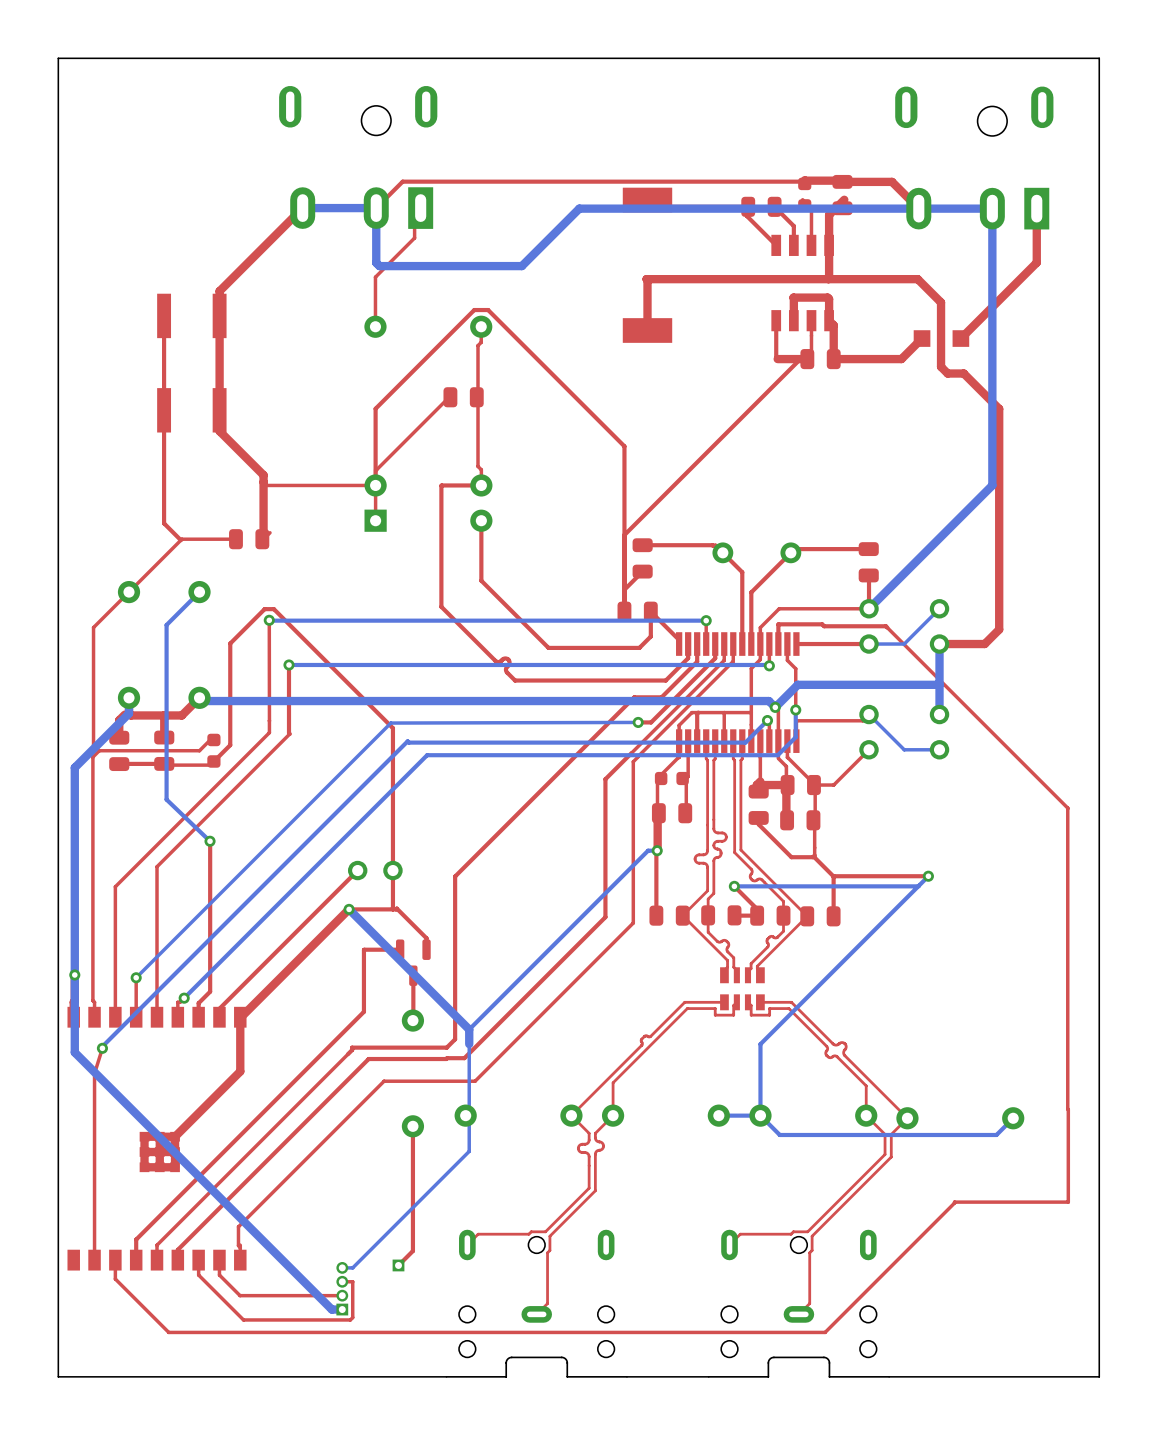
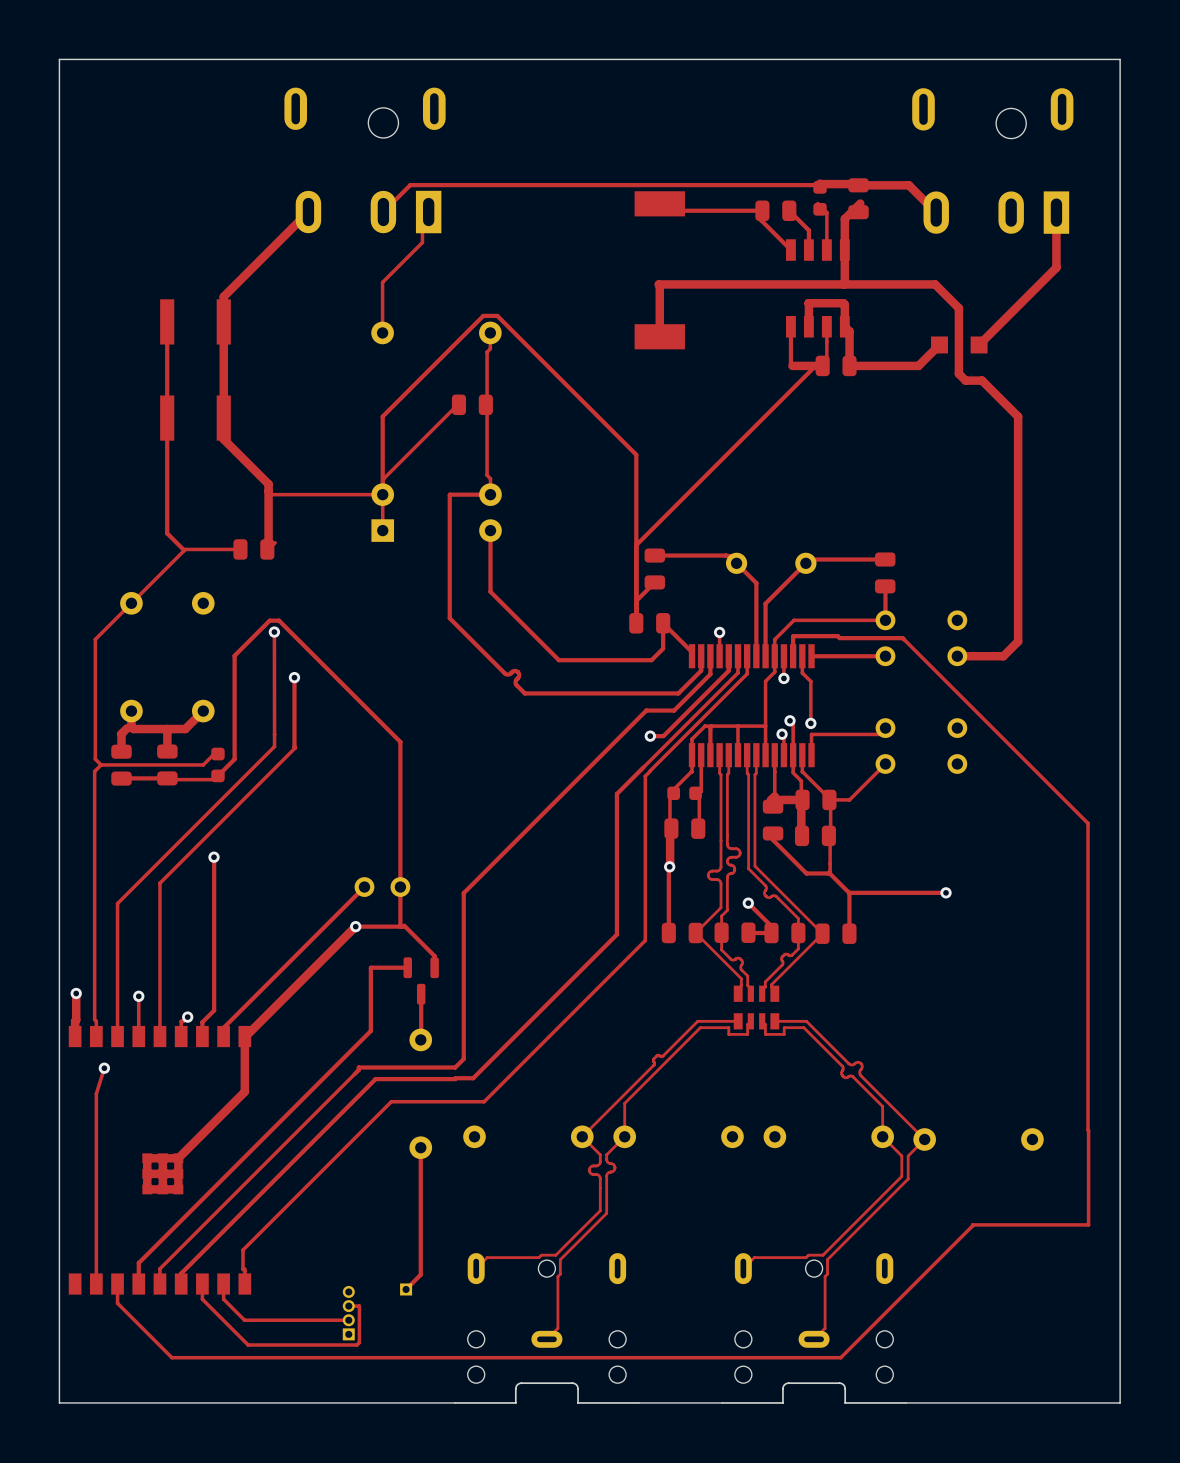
bottom track: (302, 208) (376, 208) (376, 262) (379, 266) (521, 266) (579, 208) (992, 208) (992, 485) (869, 608) -> none
bottom track: (199, 592) (166, 625) (166, 799) (210, 841) -> none
bottom track: (939, 608) (904, 644) (869, 644) -> none
bottom track: (269, 620) (706, 620) -> none
bottom track: (939, 644) (939, 714) -> none
bottom track: (288, 664) (769, 665) -> none
bottom track: (939, 684) (797, 684) (775, 707) (768, 701) (202, 701) (199, 697) -> none
bottom track: (129, 697) (129, 713) (74, 767) (74, 1052) (331, 1309) (342, 1309) -> none
bottom track: (795, 709) (795, 737) (777, 755) (427, 755) (184, 998) -> none
bottom track: (869, 714) (904, 749) (939, 749) -> none
bottom track: (767, 720) (745, 742) (407, 741) (102, 1048) -> none
bottom track: (638, 722) (390, 723) (136, 977) -> none
bottom track: (657, 850) (648, 850) (469, 1029) -> none
bottom track: (928, 876) (760, 1044) (760, 1115) -> none
bottom track: (918, 886) (734, 886) -> none
bottom track: (349, 909) (469, 1029) -> none
bottom track: (469, 1029) (469, 1151) (352, 1267) (342, 1267) -> none
bottom track: (760, 1115) (718, 1115) -> none
bottom track: (760, 1115) (779, 1134) (996, 1134) (1013, 1118) -> none

